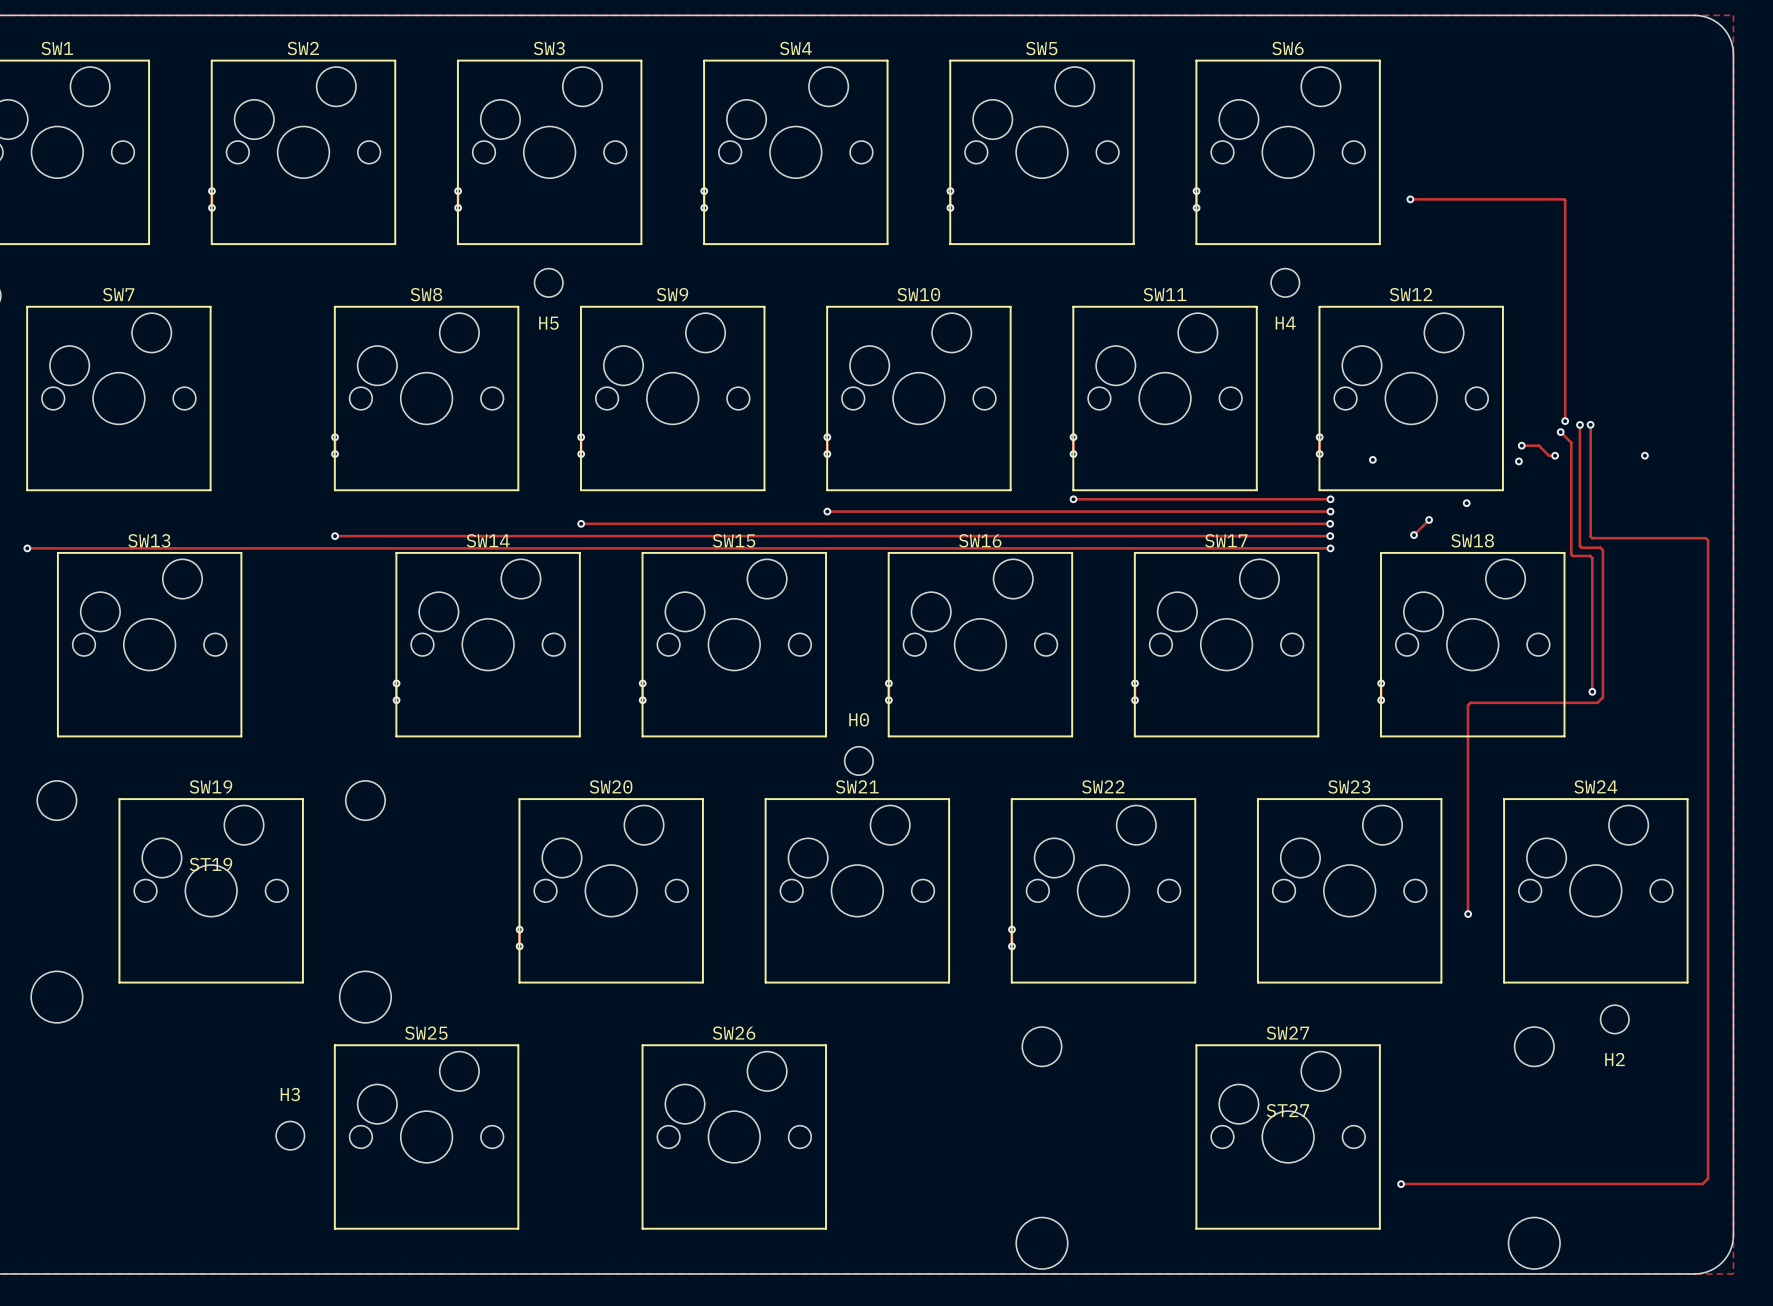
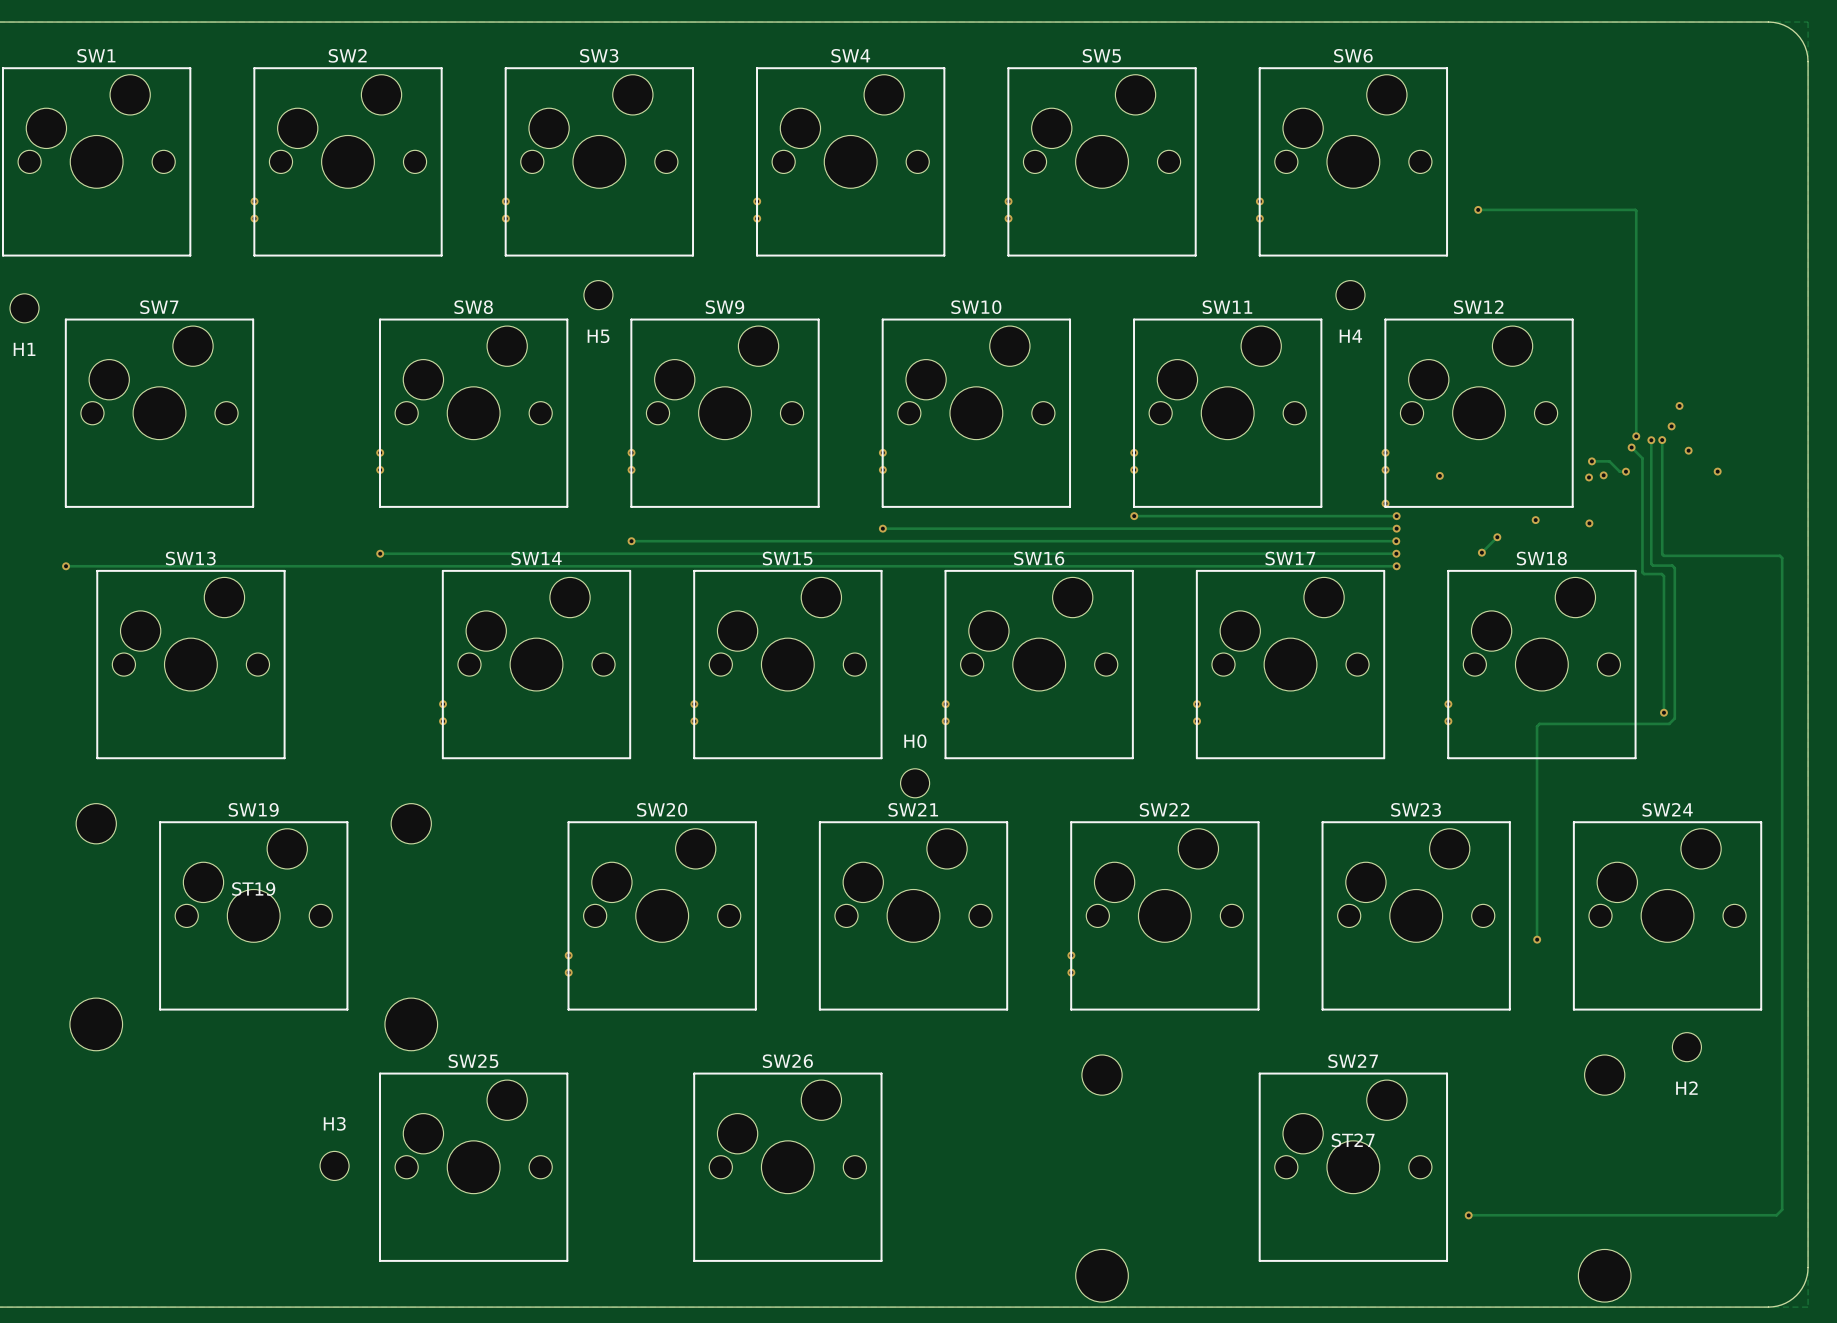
via: none -> (1679, 405)
via: none -> (1671, 426)
via: none -> (1688, 450)
via: none -> (1603, 475)
via: none -> (1385, 503)
via: none -> (1589, 523)

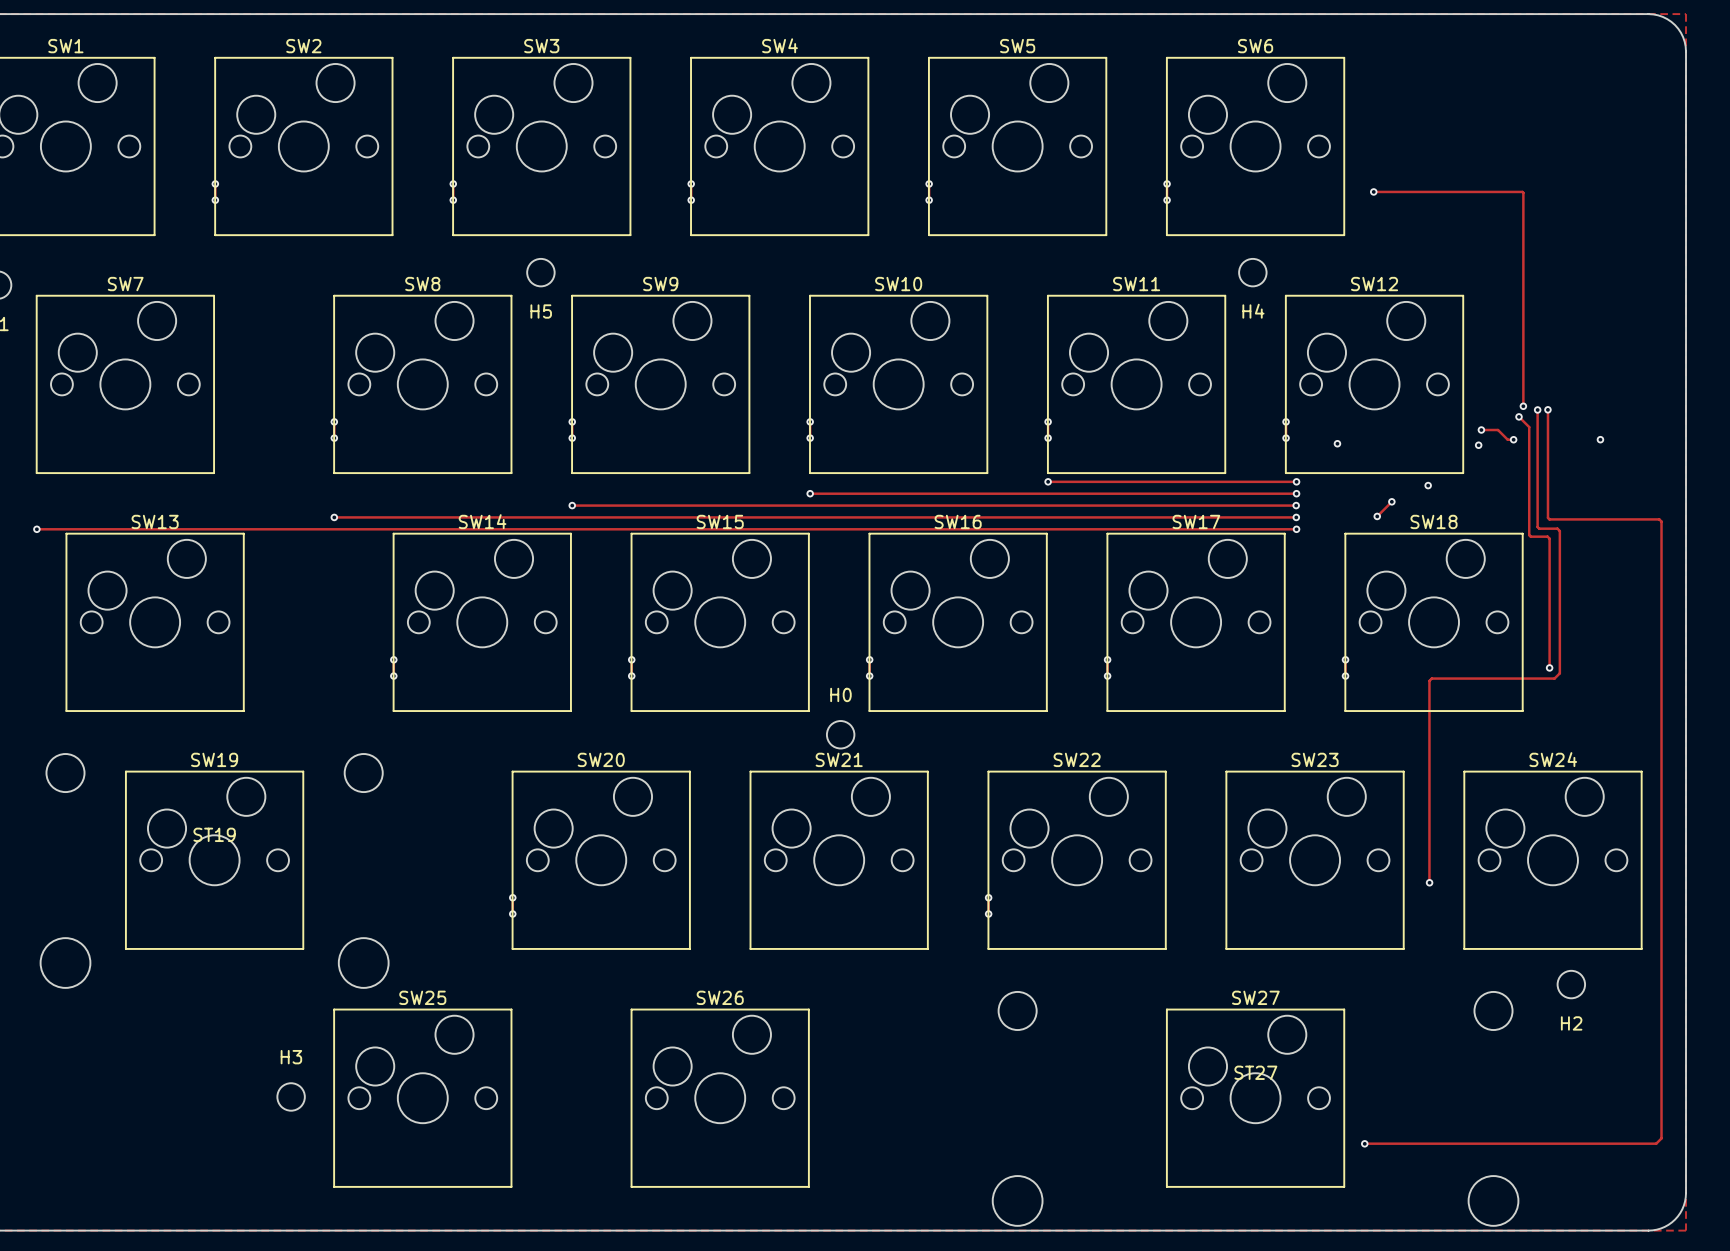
via: (1679, 405) -> none
via: (1671, 426) -> none
via: (1688, 450) -> none
via: (1603, 475) -> none
via: (1385, 503) -> none
via: (1589, 523) -> none

